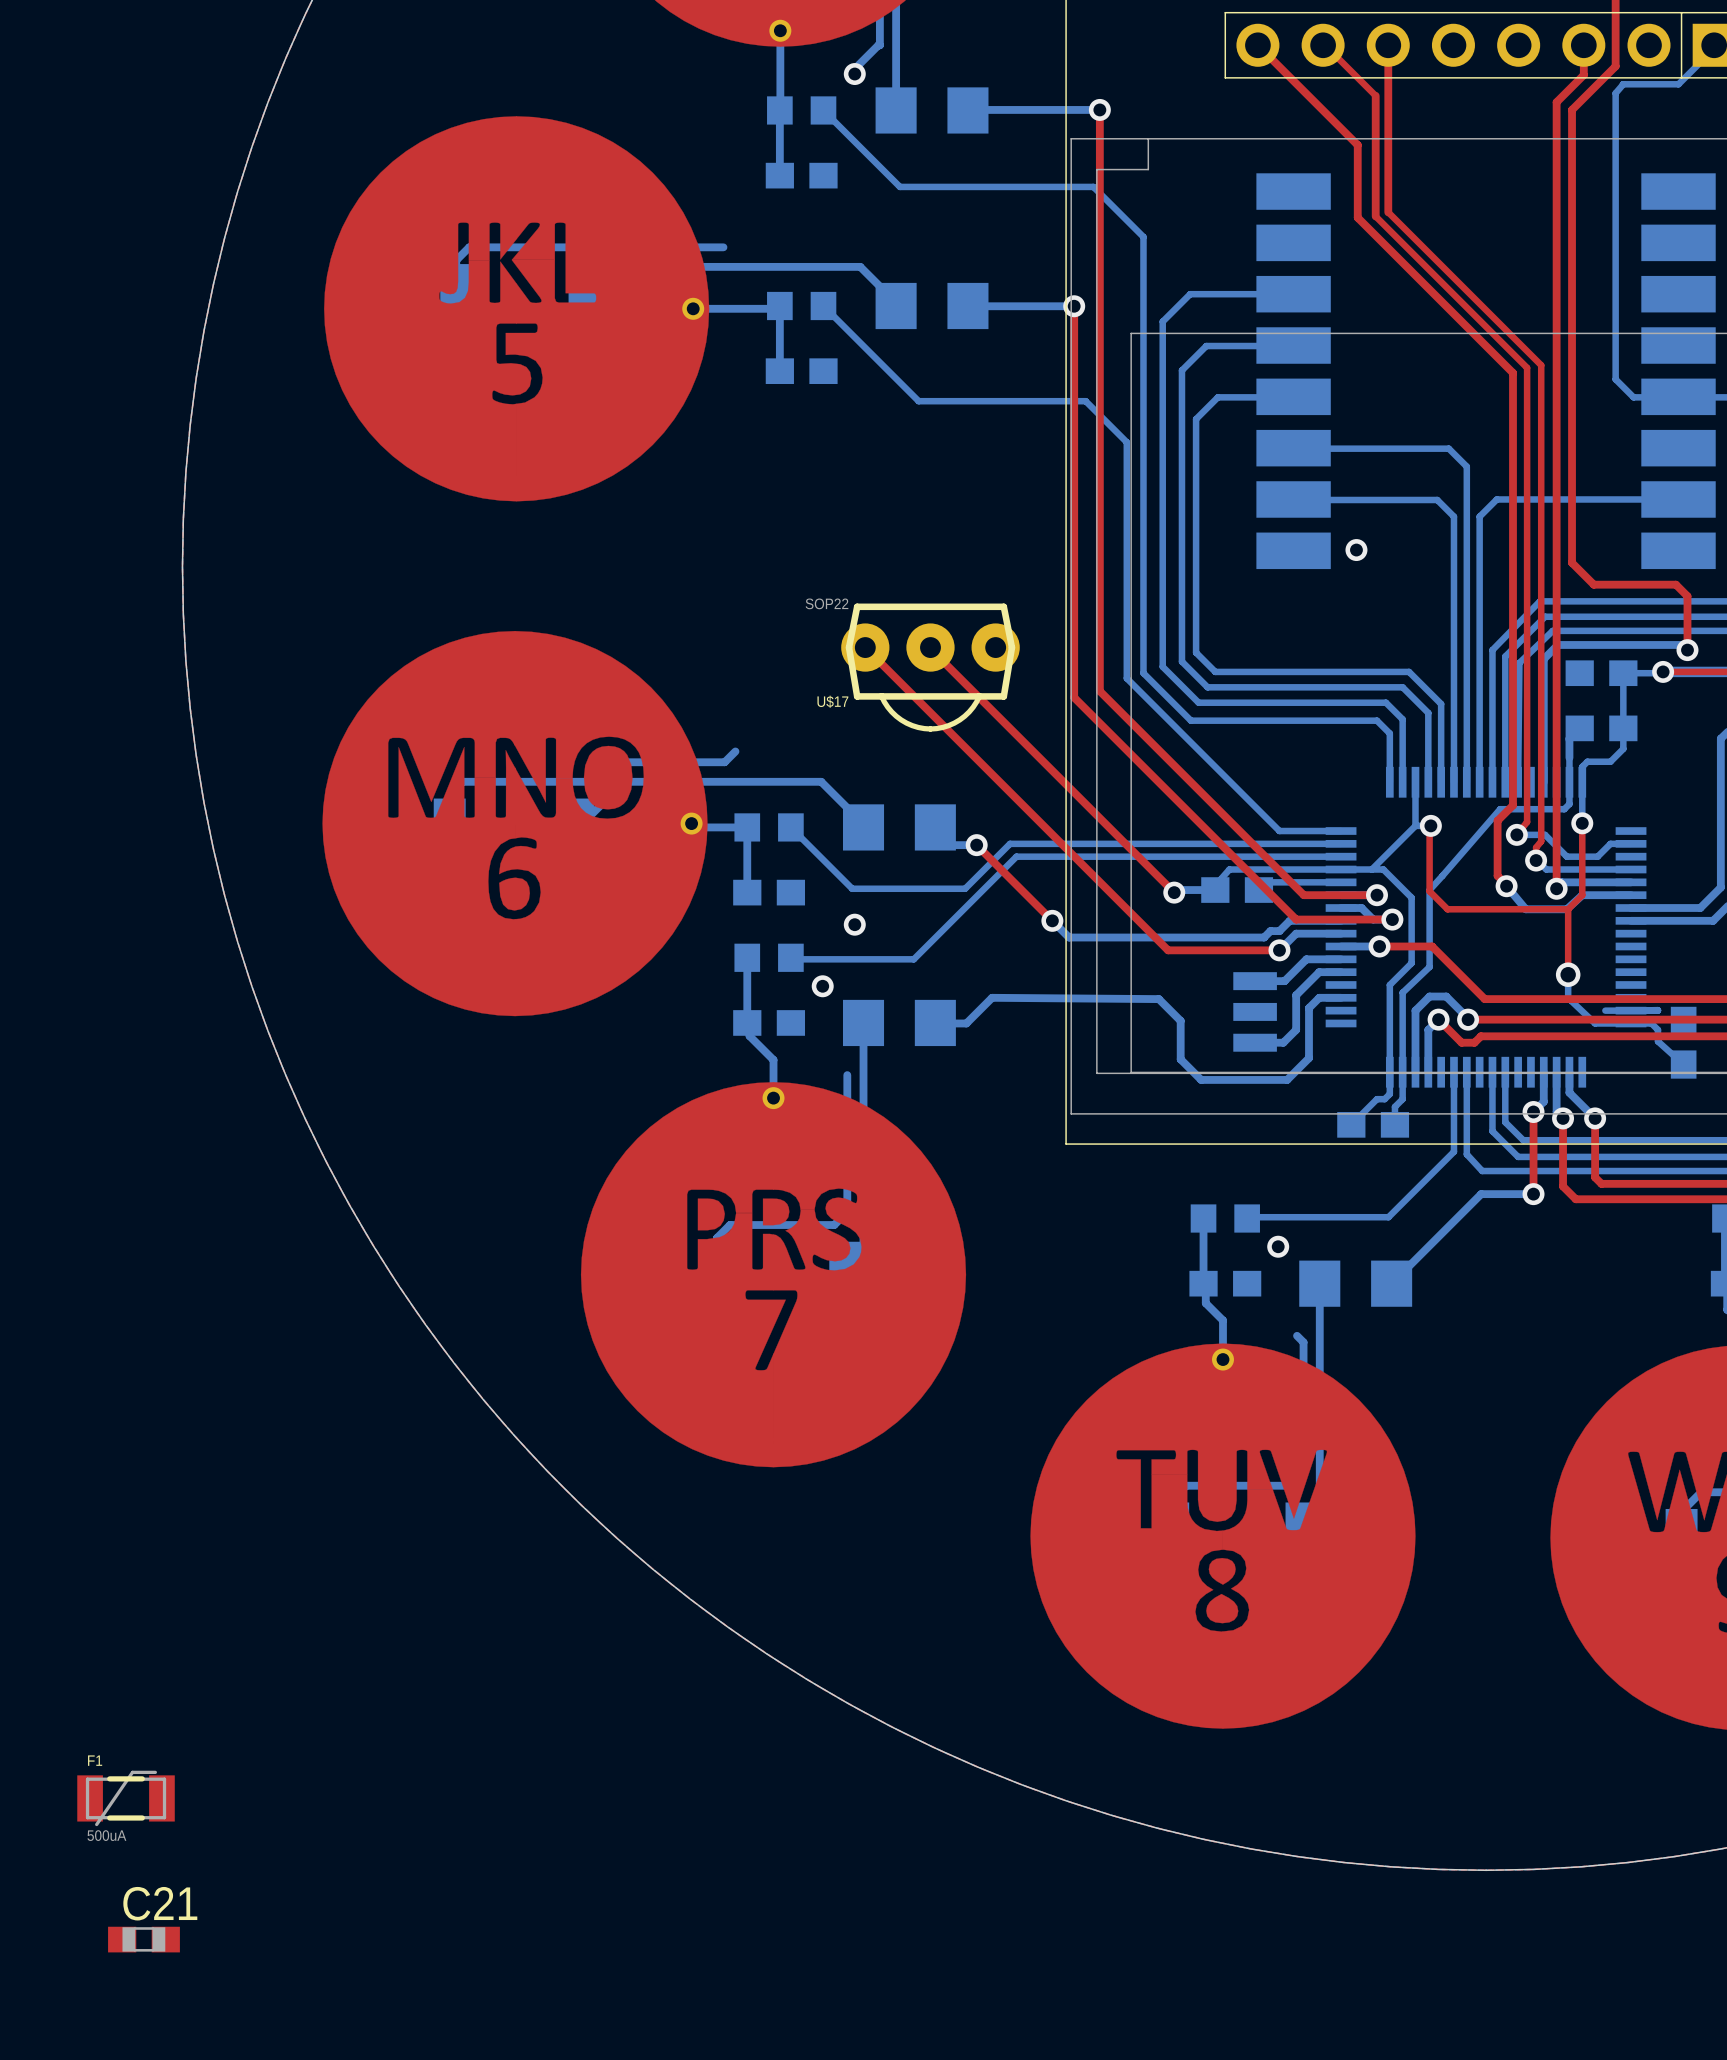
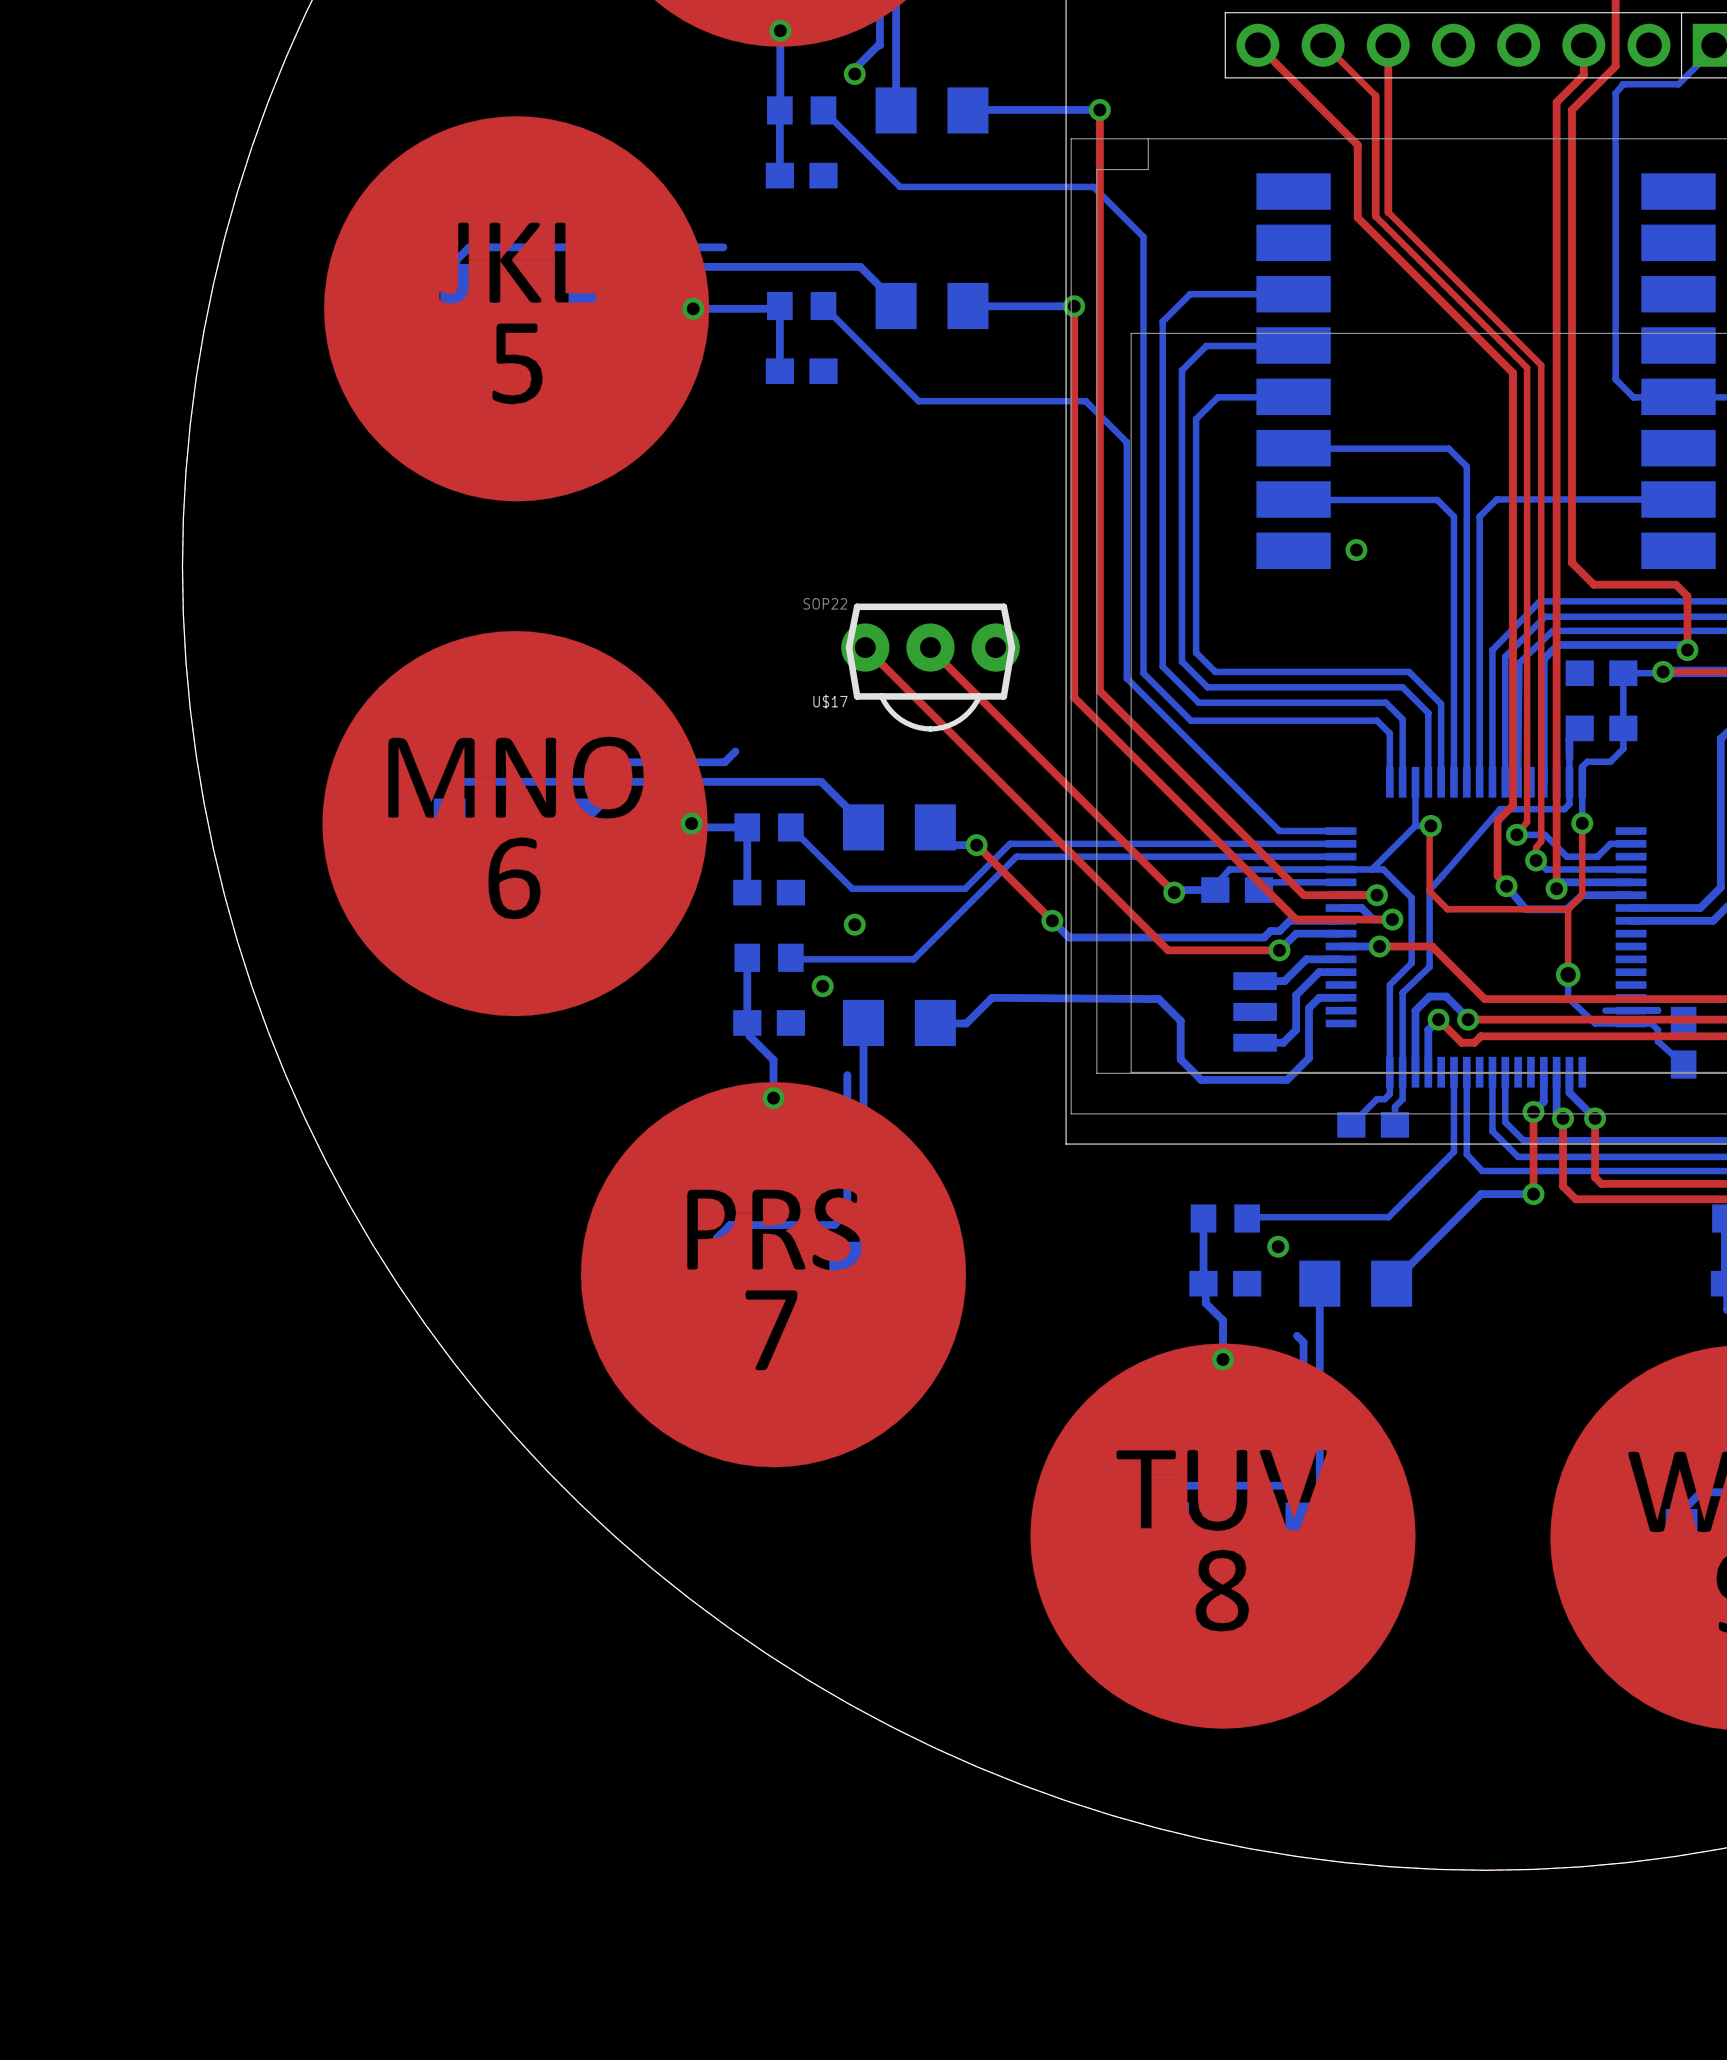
F1: 500uA (126, 1798) -> none
C21: (143, 1939) -> none

